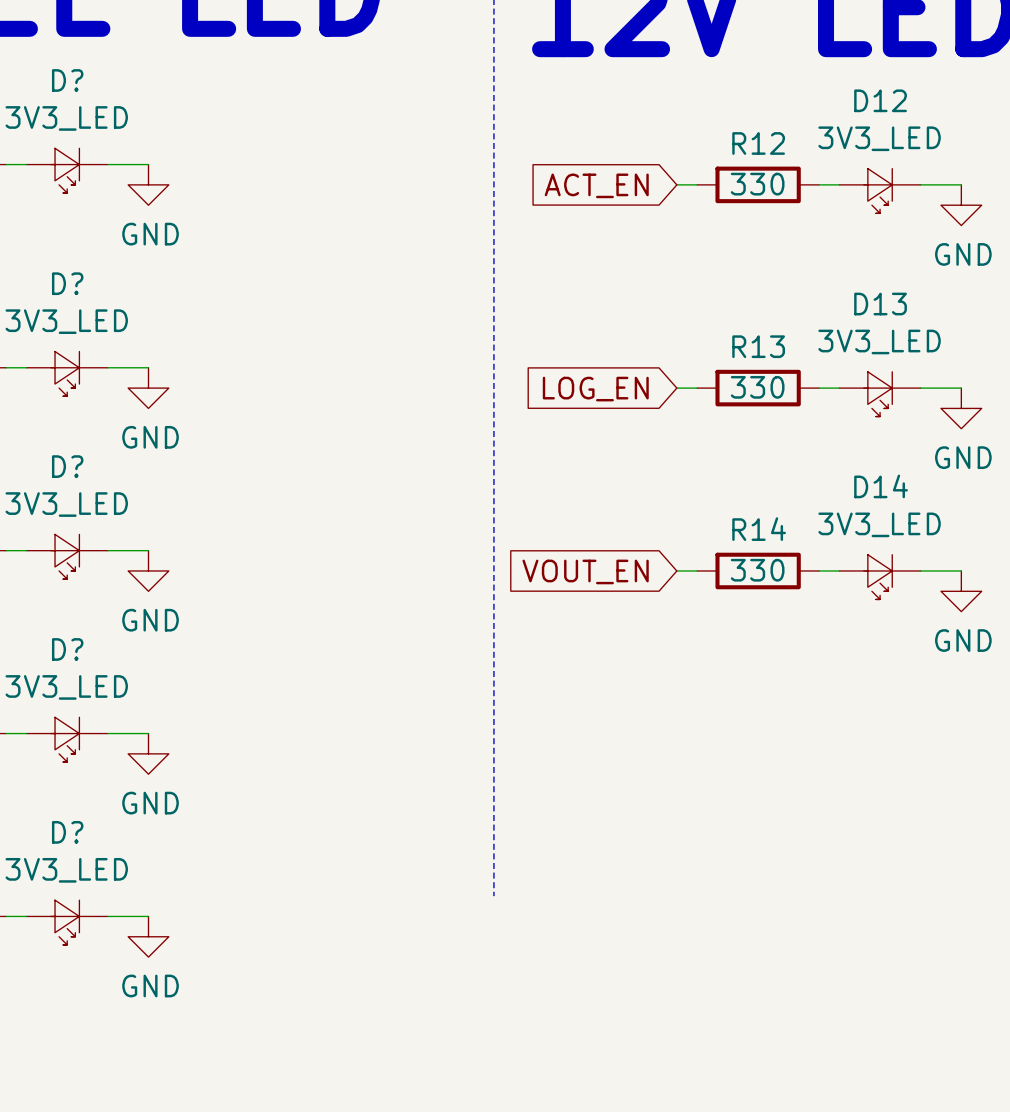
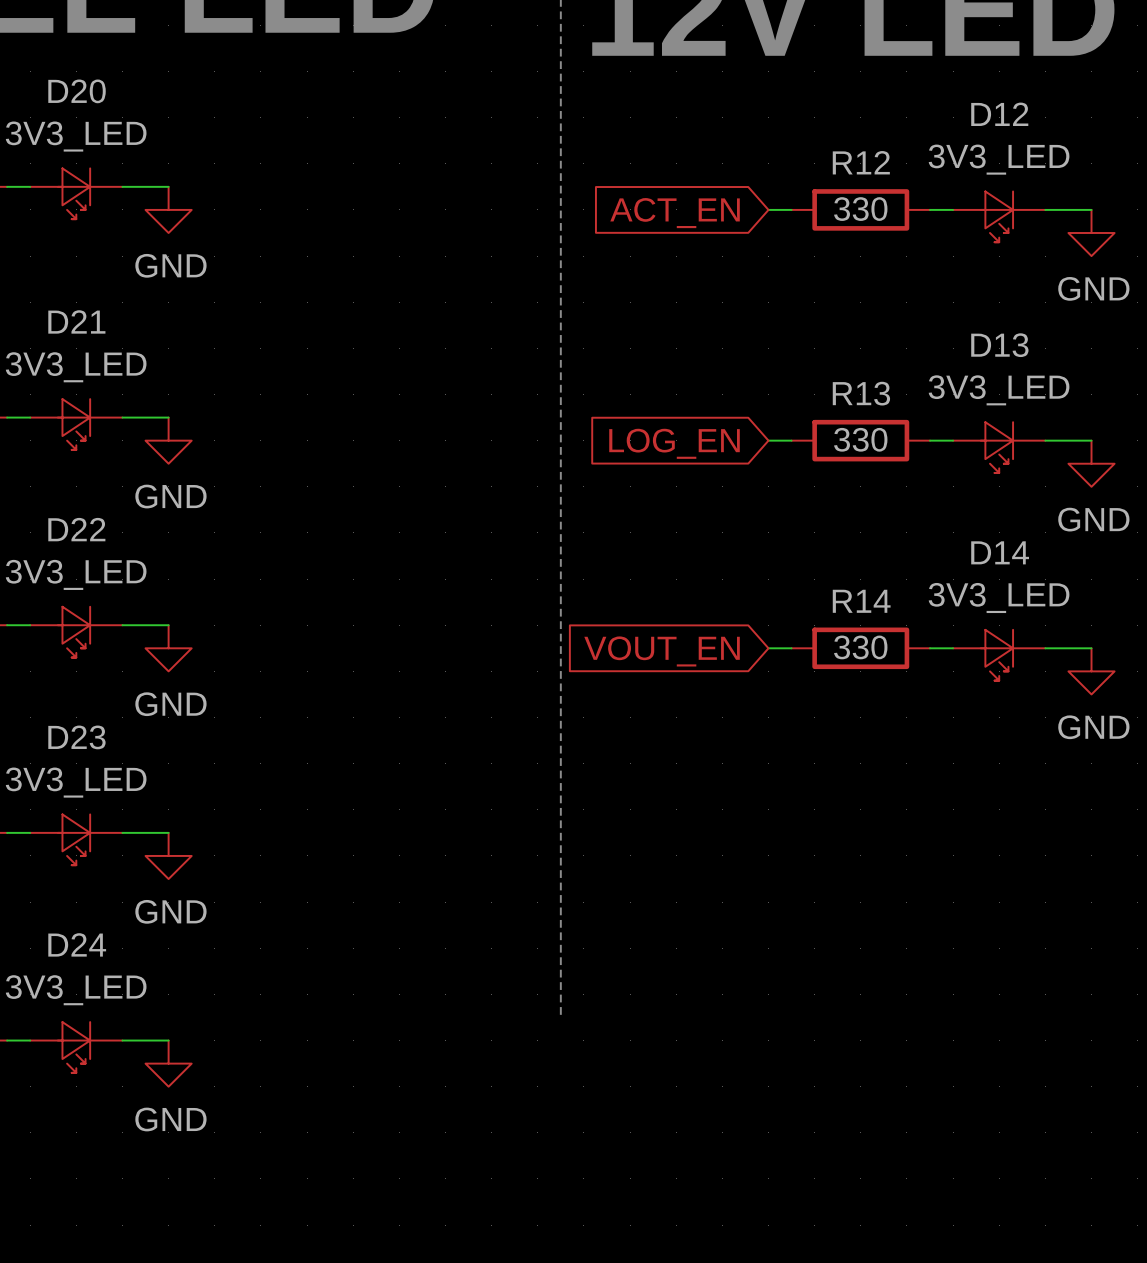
D? name: D? (67, 80) -> D20 (77, 91)
D? name: D? (67, 283) -> D21 (76, 321)
D? name: D? (67, 466) -> D22 (76, 529)
D? name: D? (67, 649) -> D23 (76, 737)
D? name: D? (67, 832) -> D24 (77, 944)

